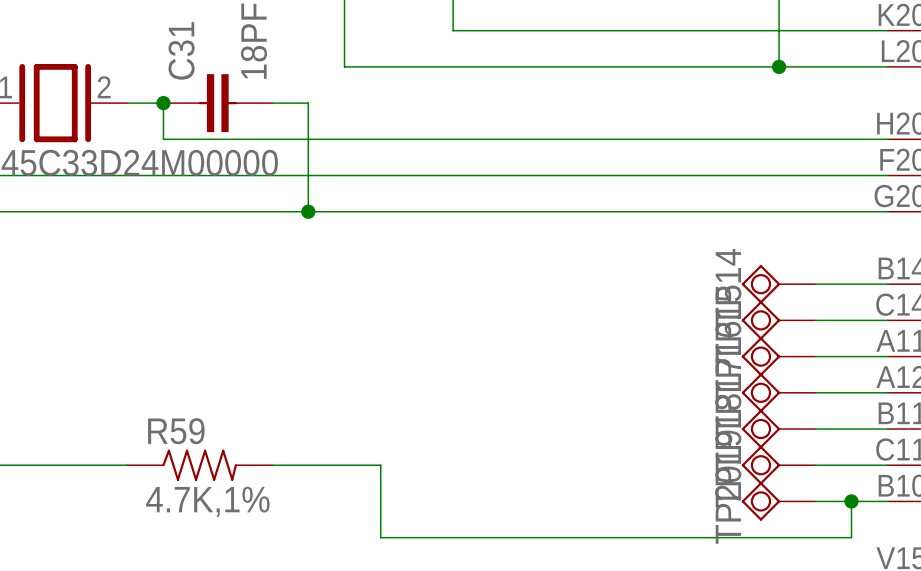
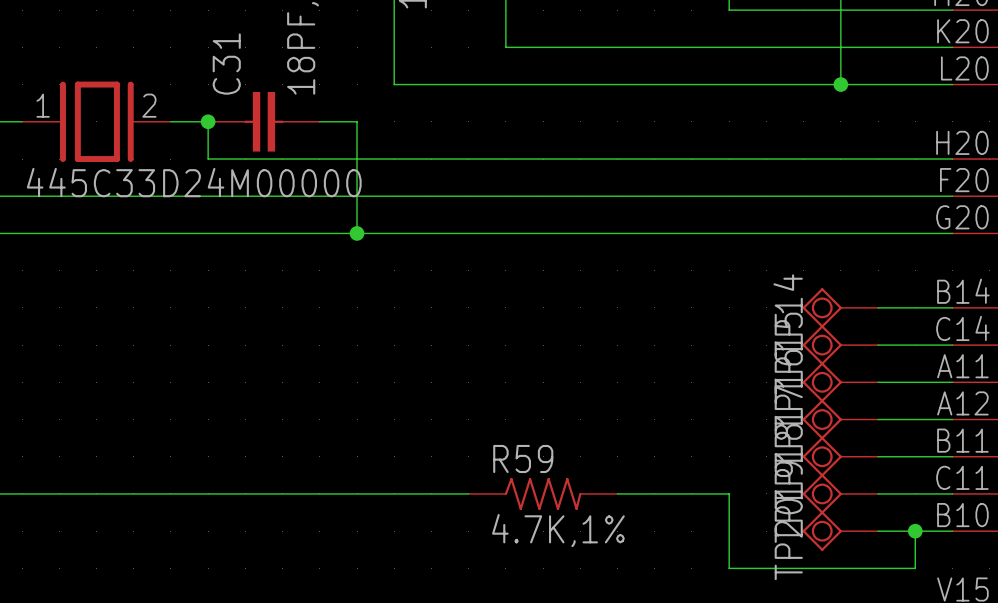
R59 position: (199, 465) -> (543, 493)
wire: (380, 465) (380, 537) (670, 537) -> (617, 493) (729, 493) (729, 568)
wire: none -> (431, 493) (468, 493)

